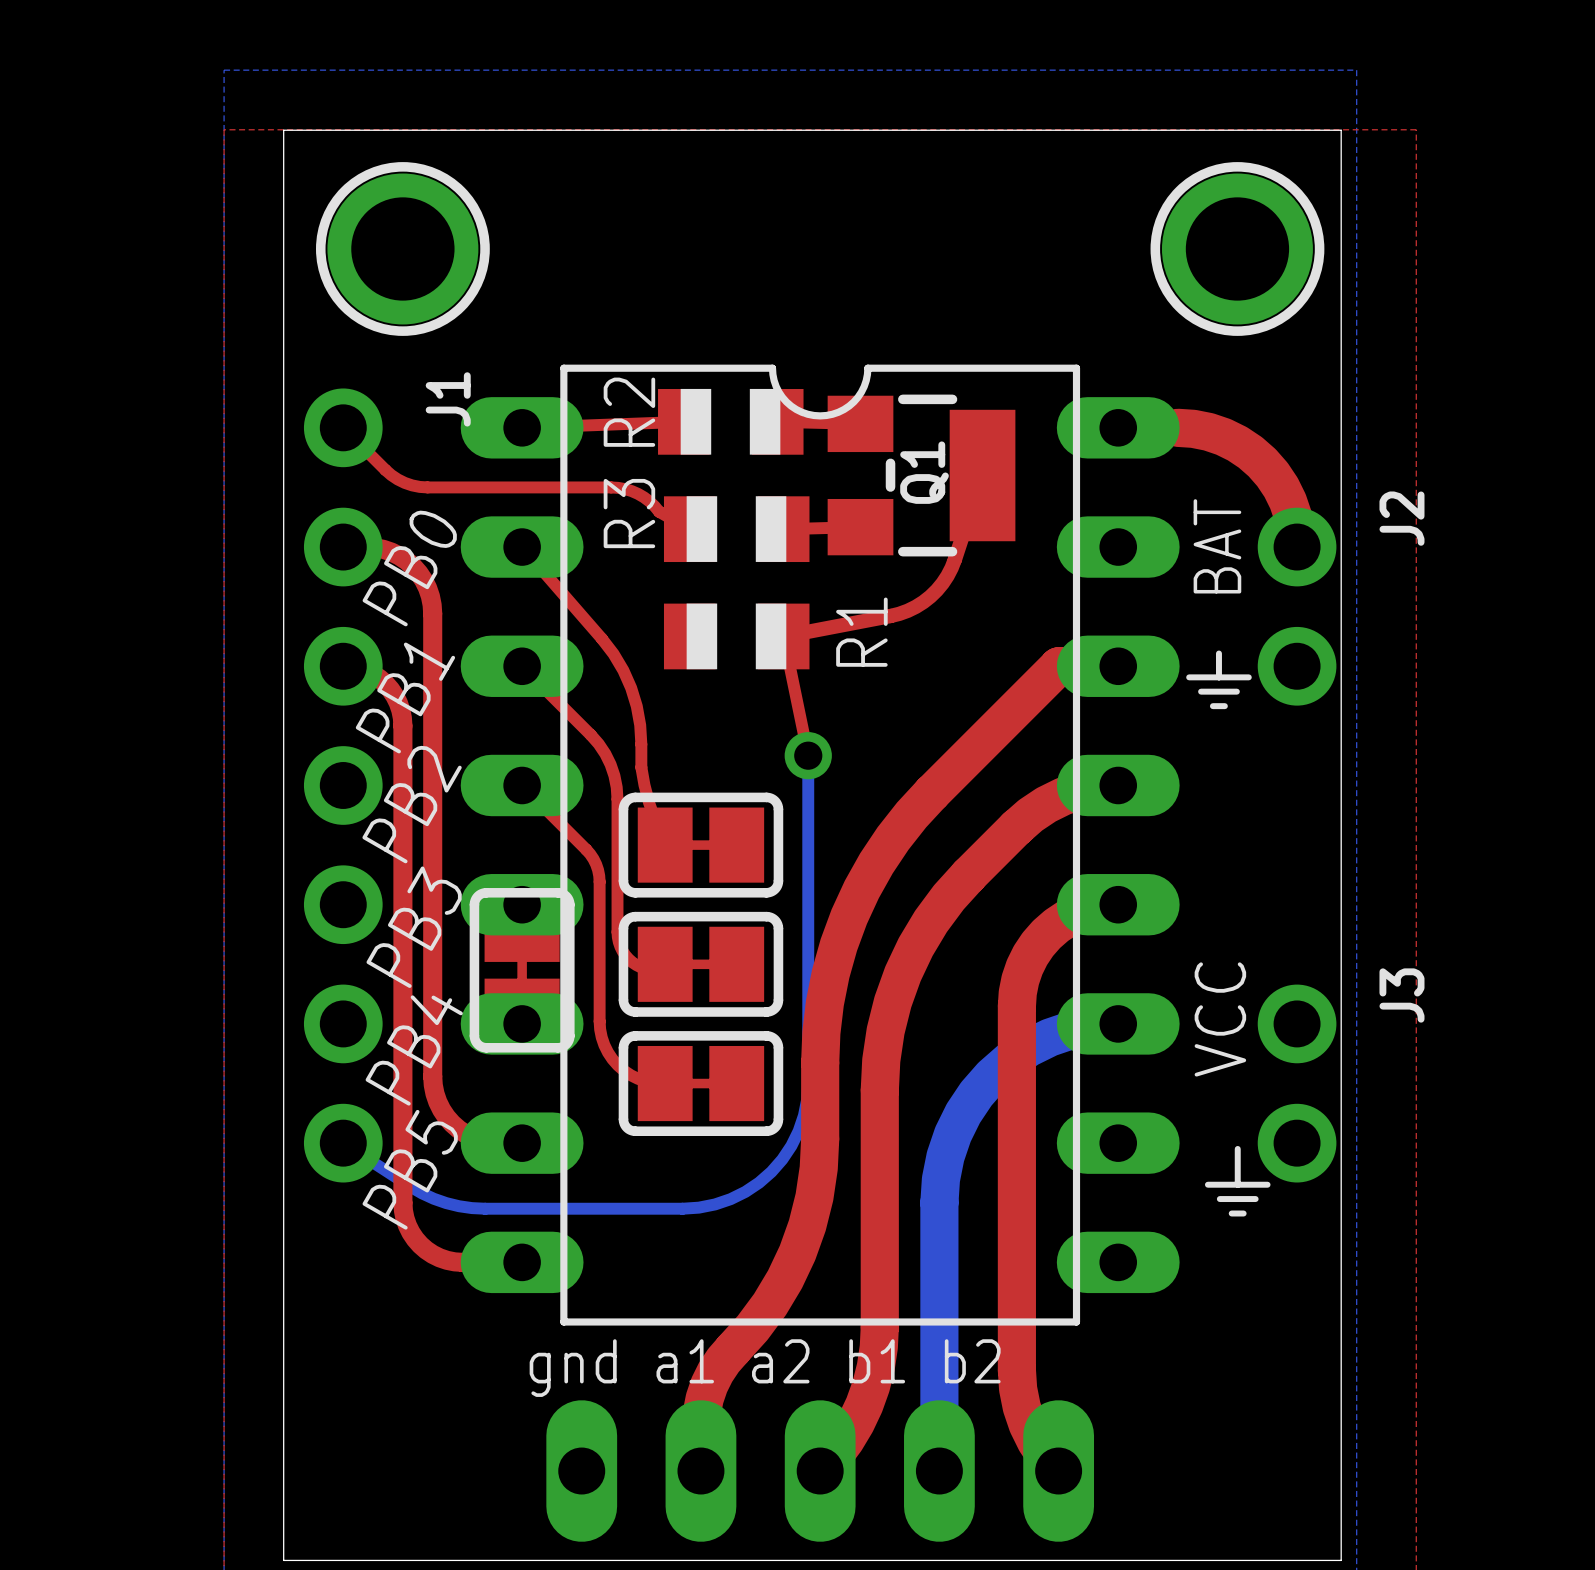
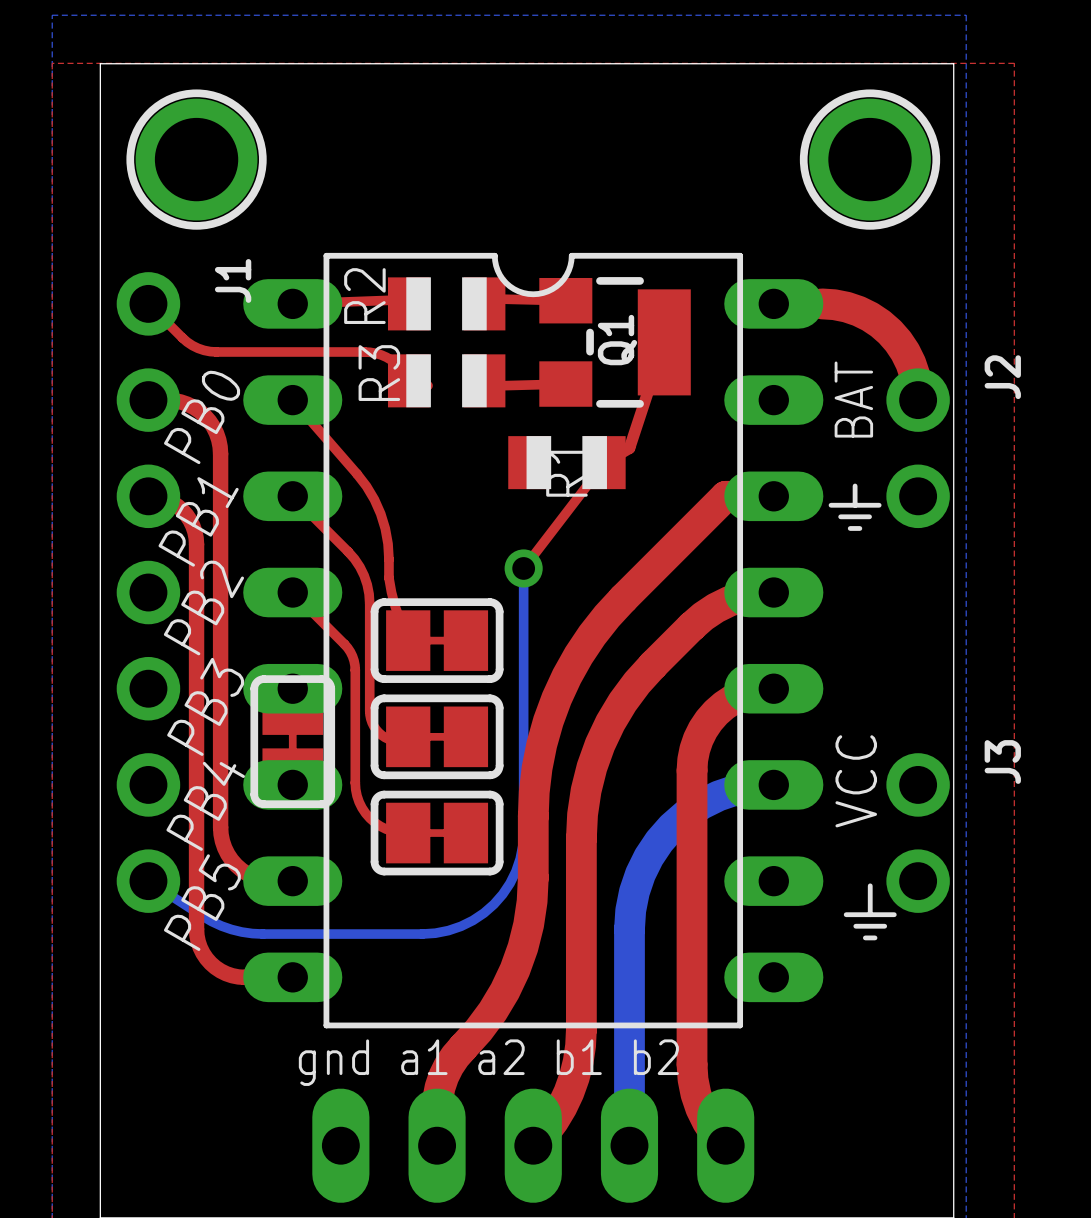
R2 position: (730, 421) -> (446, 303)
R3 position: (736, 529) -> (446, 380)
top track: (954, 559) (947, 575) (936, 590) (923, 602) (907, 610) (890, 615) (783, 636) (808, 755) -> (642, 410) (629, 448) (604, 462) (523, 568)
R1 position: (736, 636) -> (566, 462)

